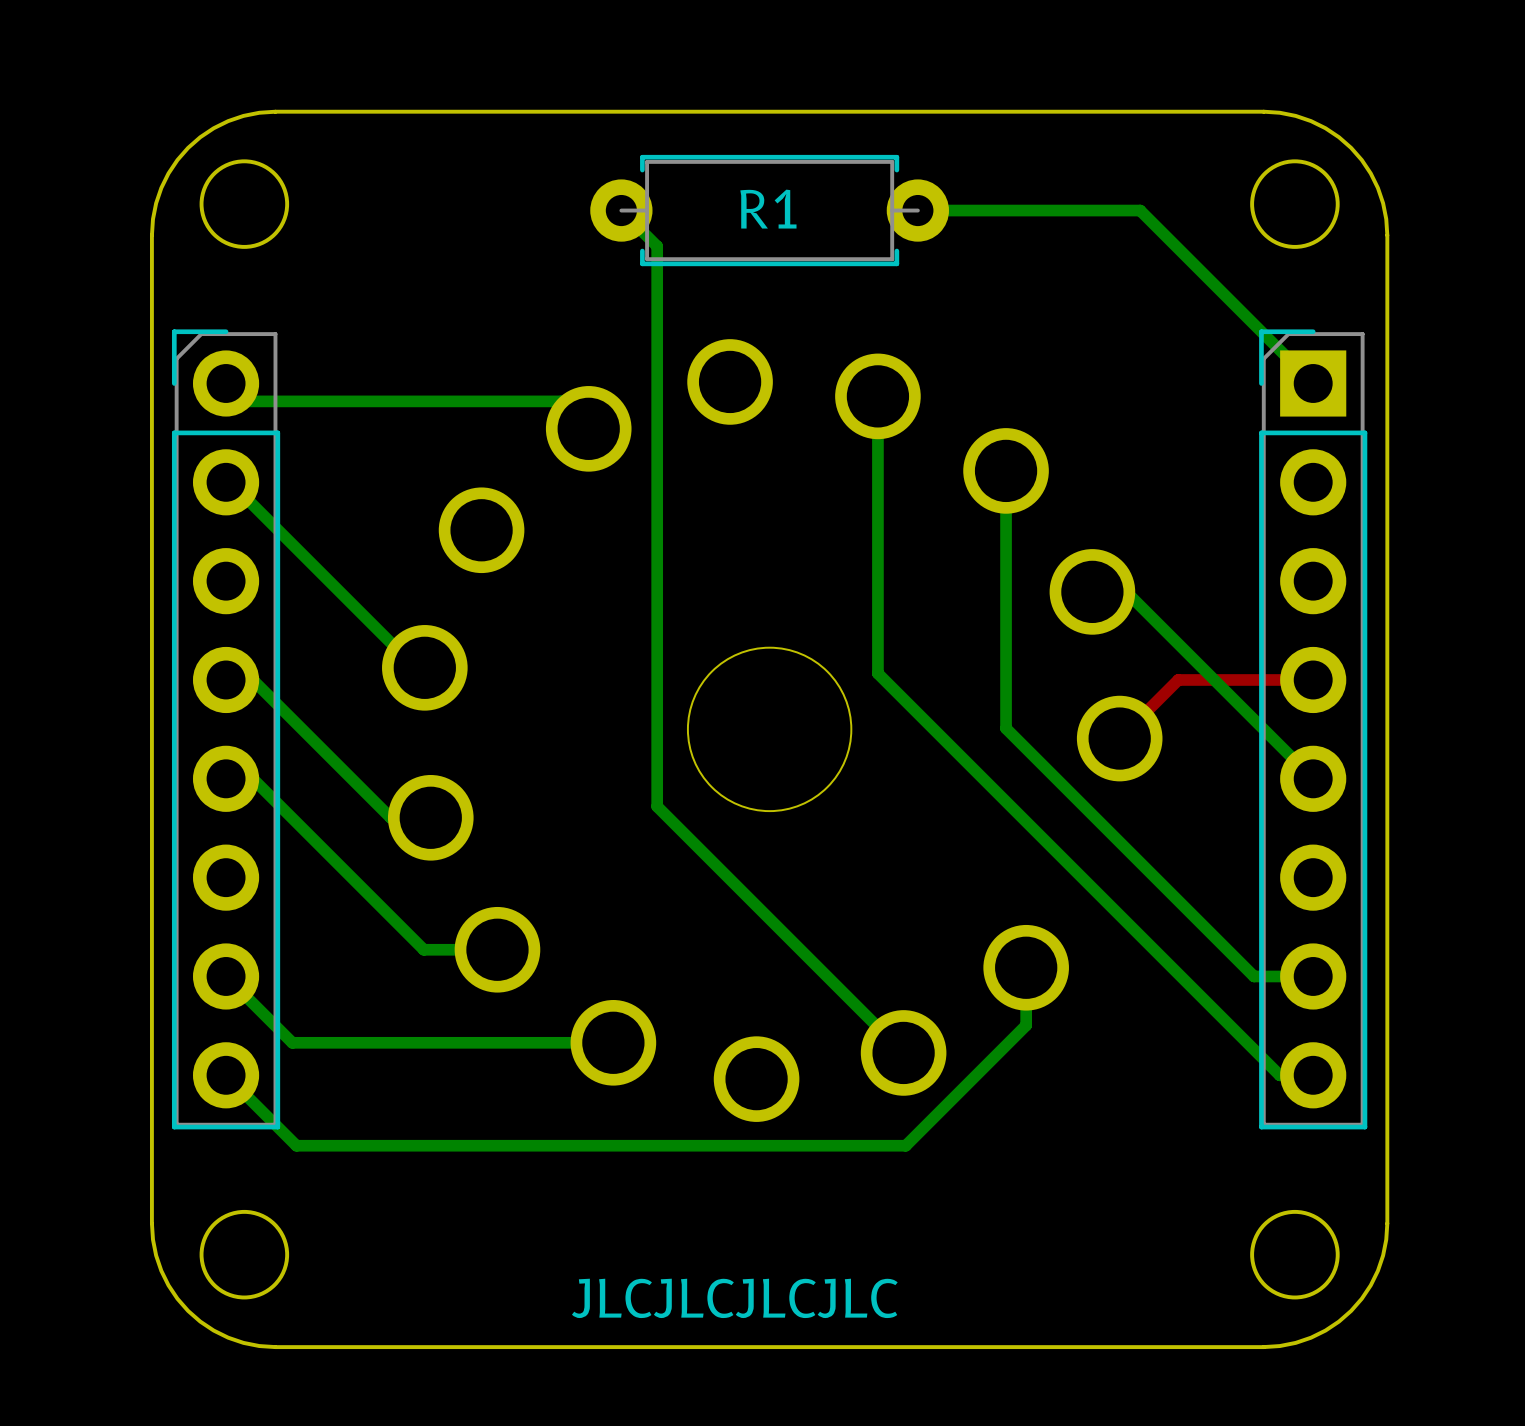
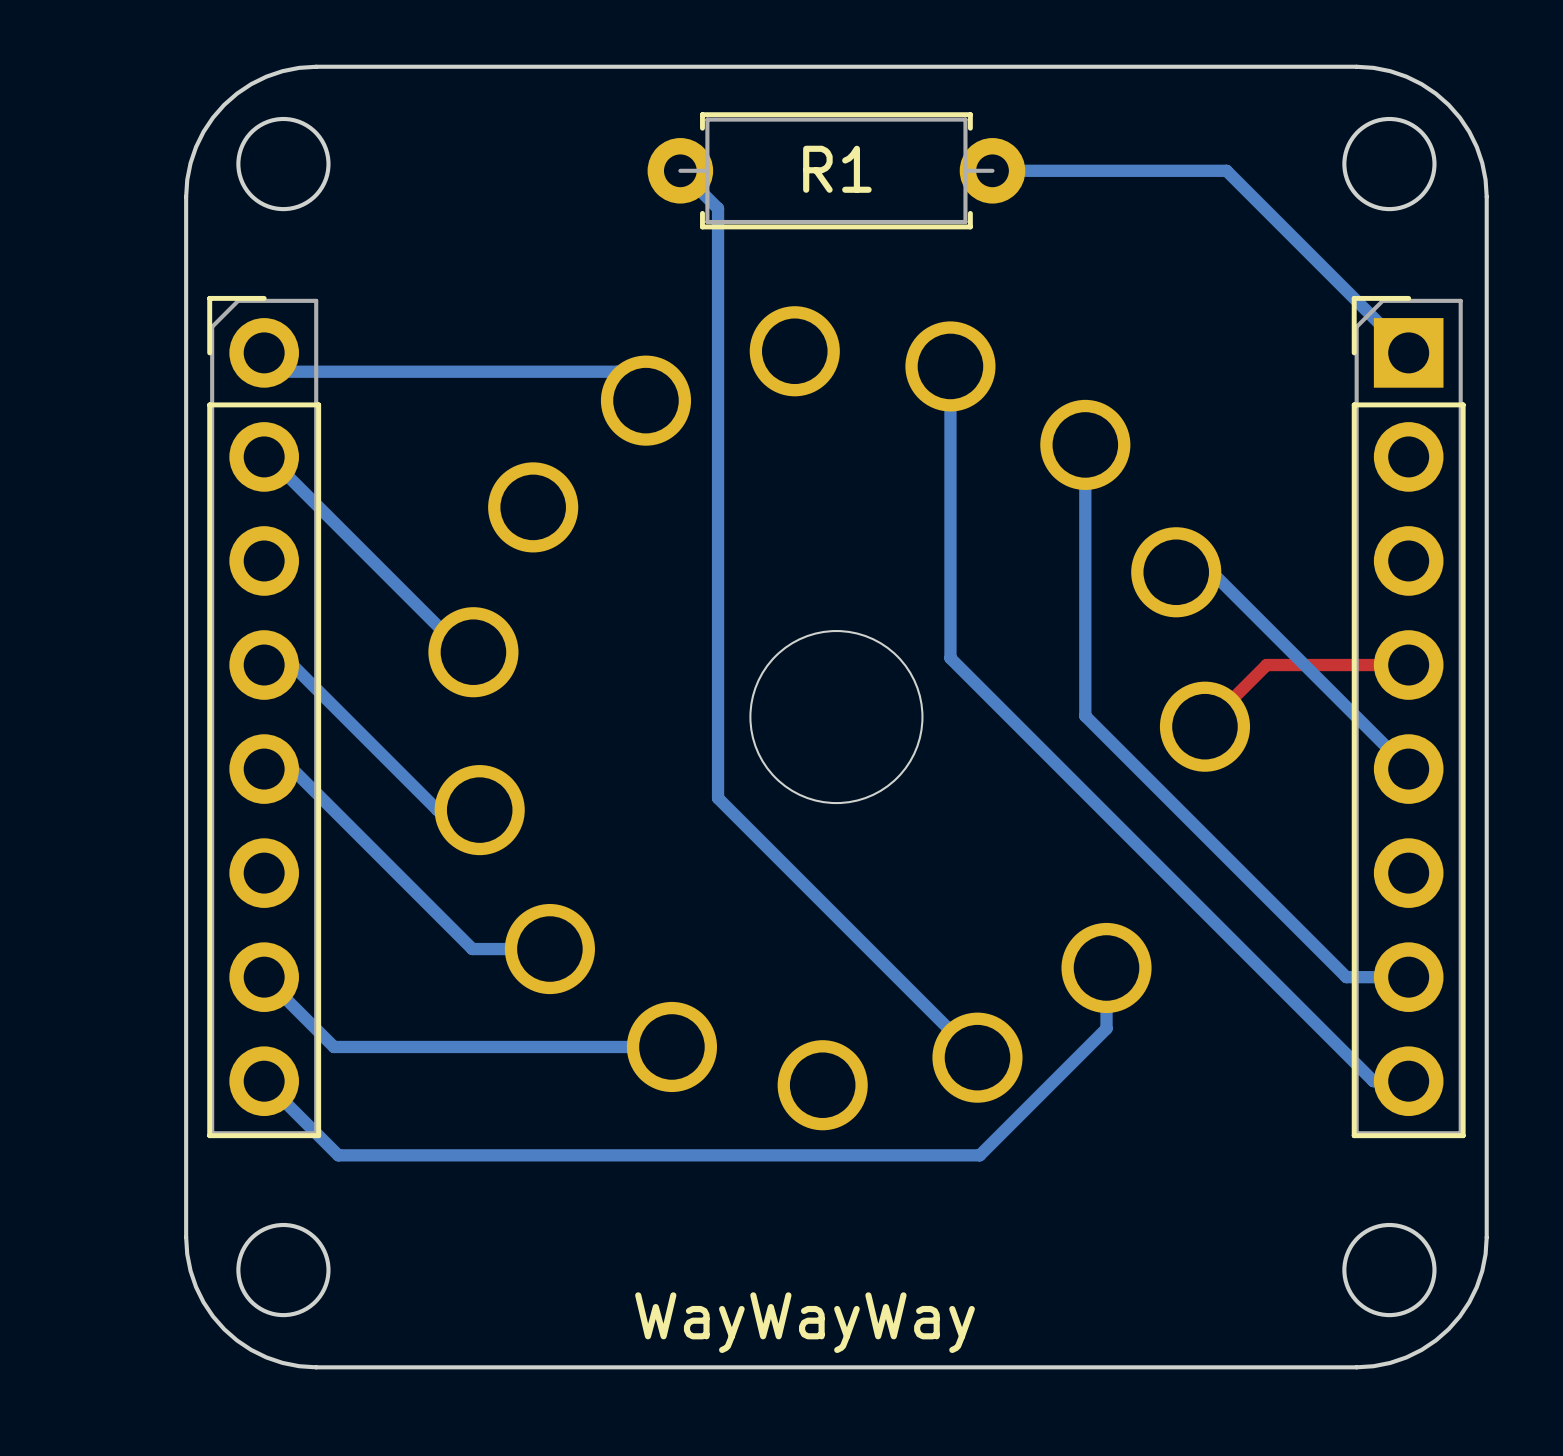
text: JLCJLCJLCJLC (734, 1298) -> WayWayWay (805, 1322)

